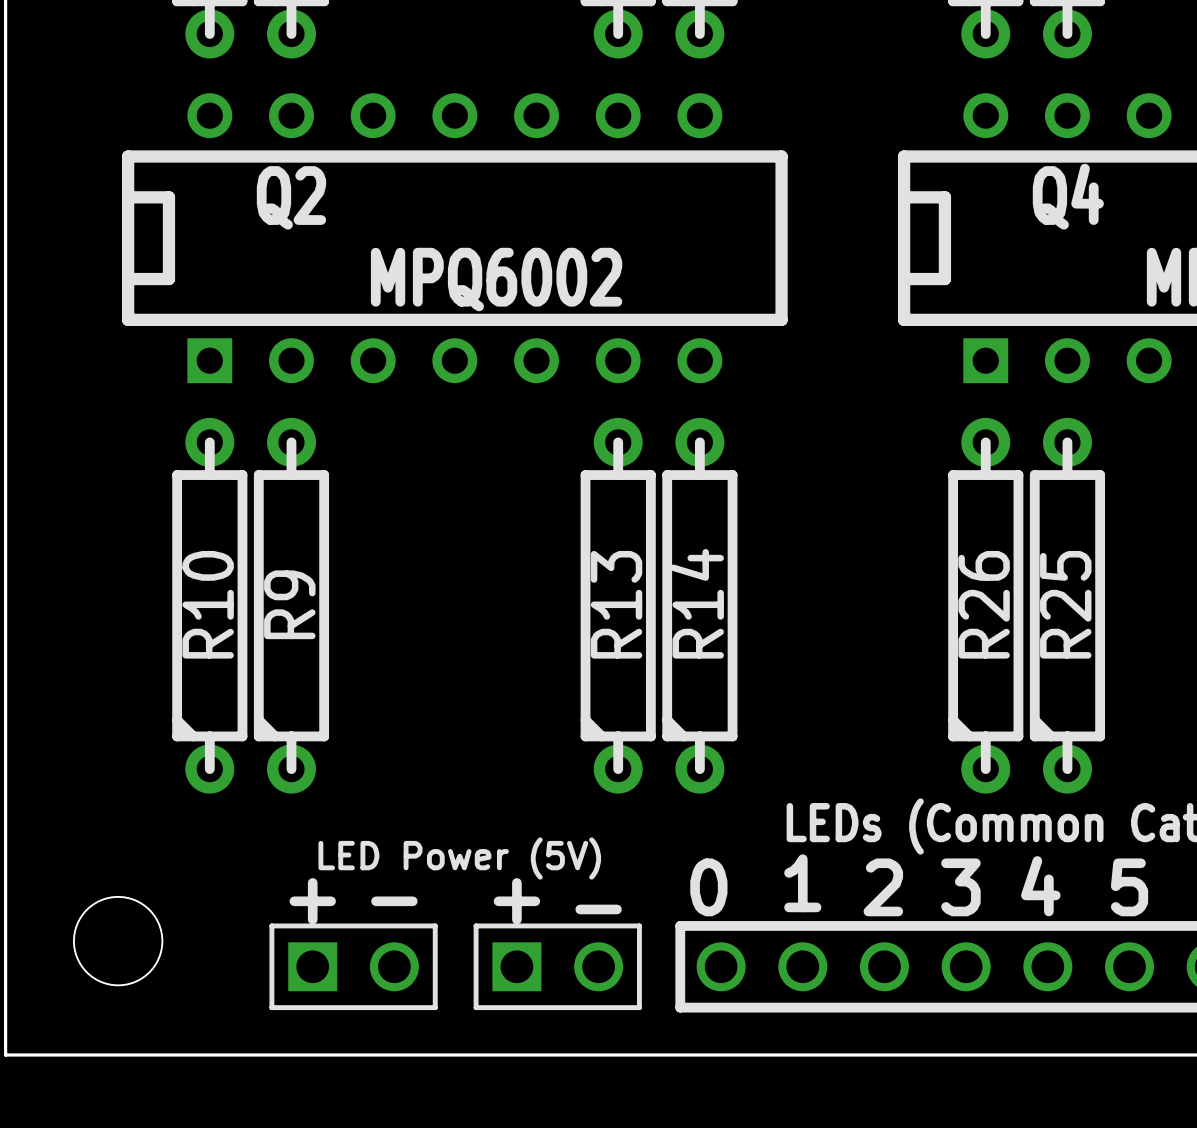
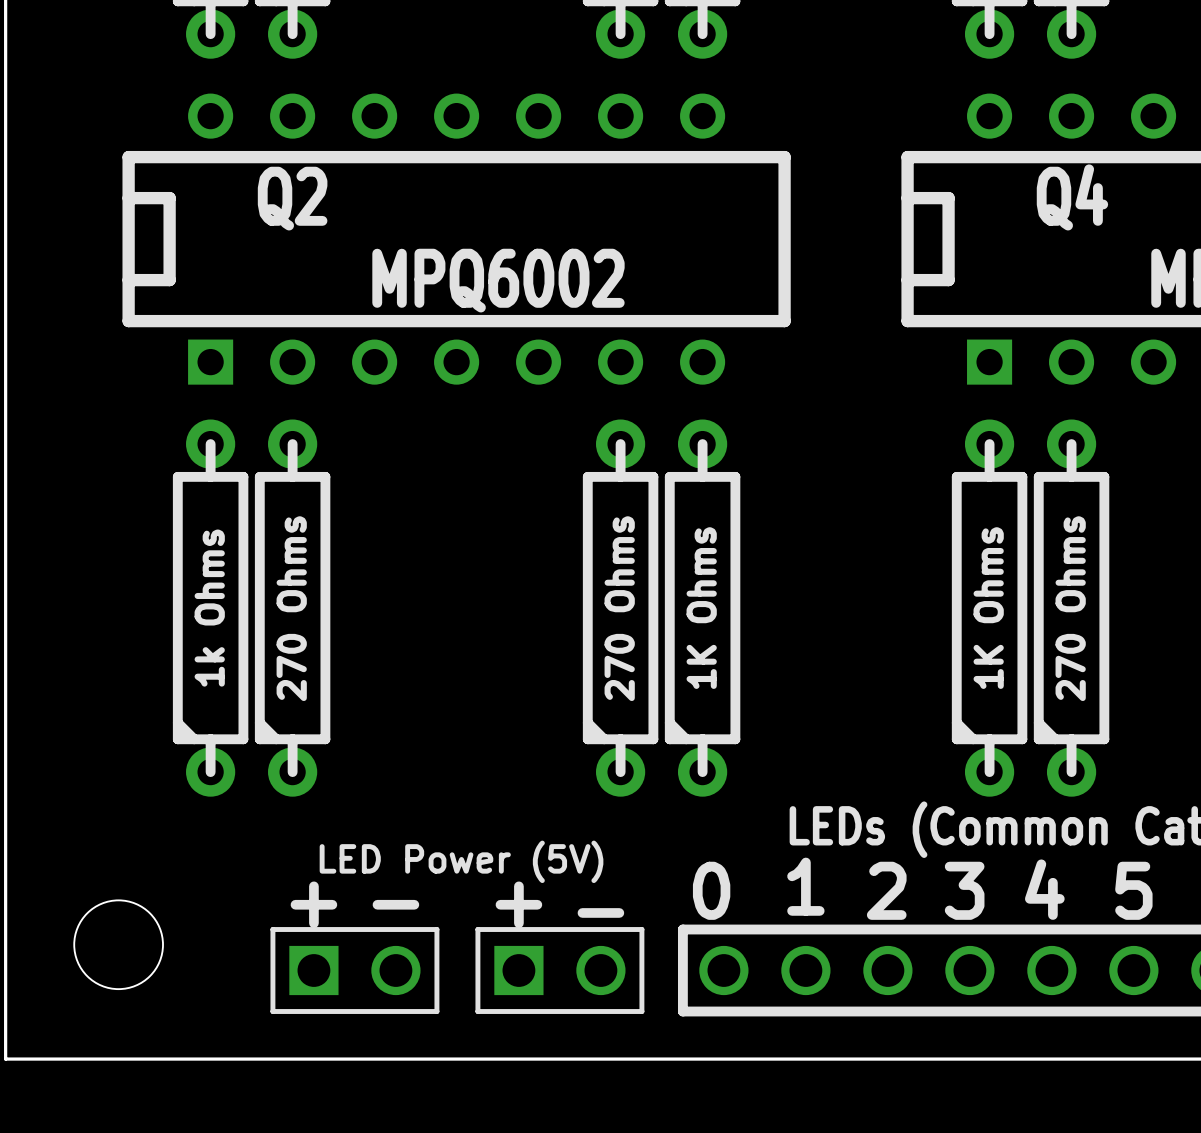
R14 name: R14 (697, 603) -> none
R10 name: R10 (208, 604) -> none
R9 name: R9 (289, 604) -> none
R13 name: R13 (616, 604) -> none
R26 name: R26 (984, 604) -> none
R25 name: R25 (1065, 604) -> none
R10 value: none -> 1k Ohms (209, 608)
R14 value: none -> 1K Ohms (701, 608)
R26 value: none -> 1K Ohms (988, 608)
R9 value: none -> 270 Ohms (291, 608)
R13 value: none -> 270 Ohms (619, 608)
R25 value: none -> 270 Ohms (1070, 608)

